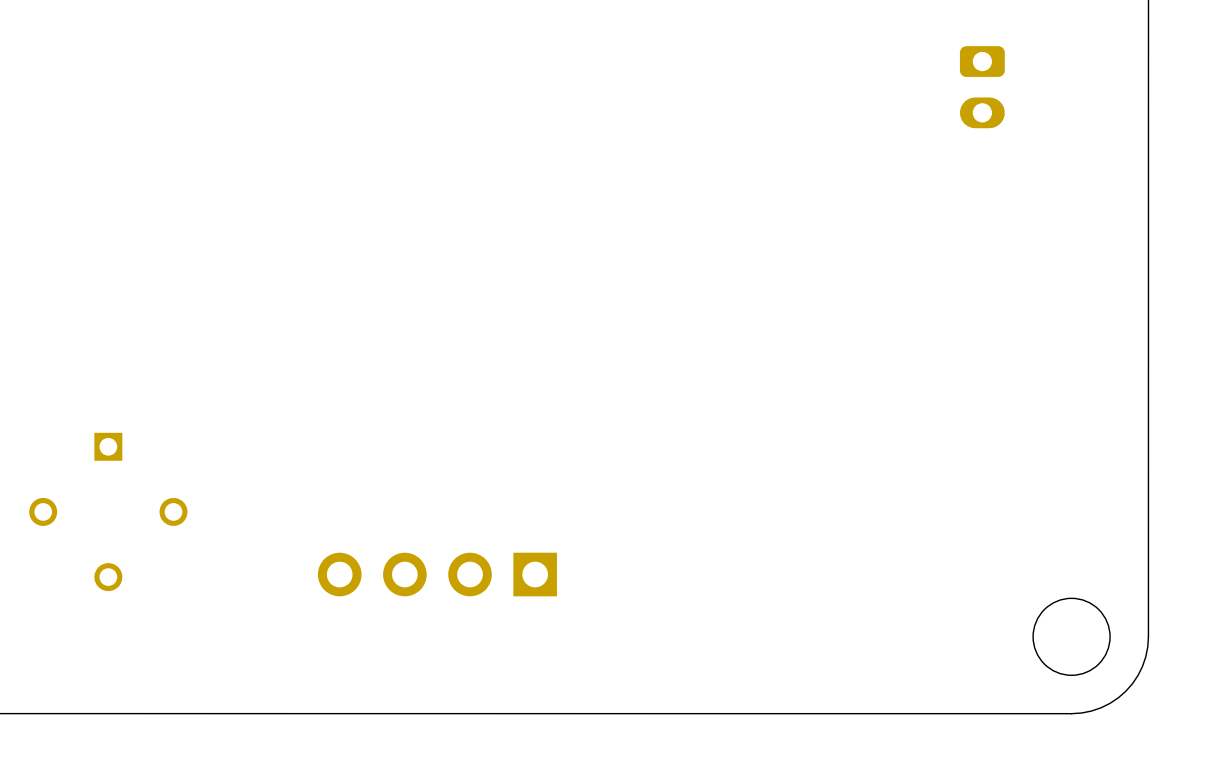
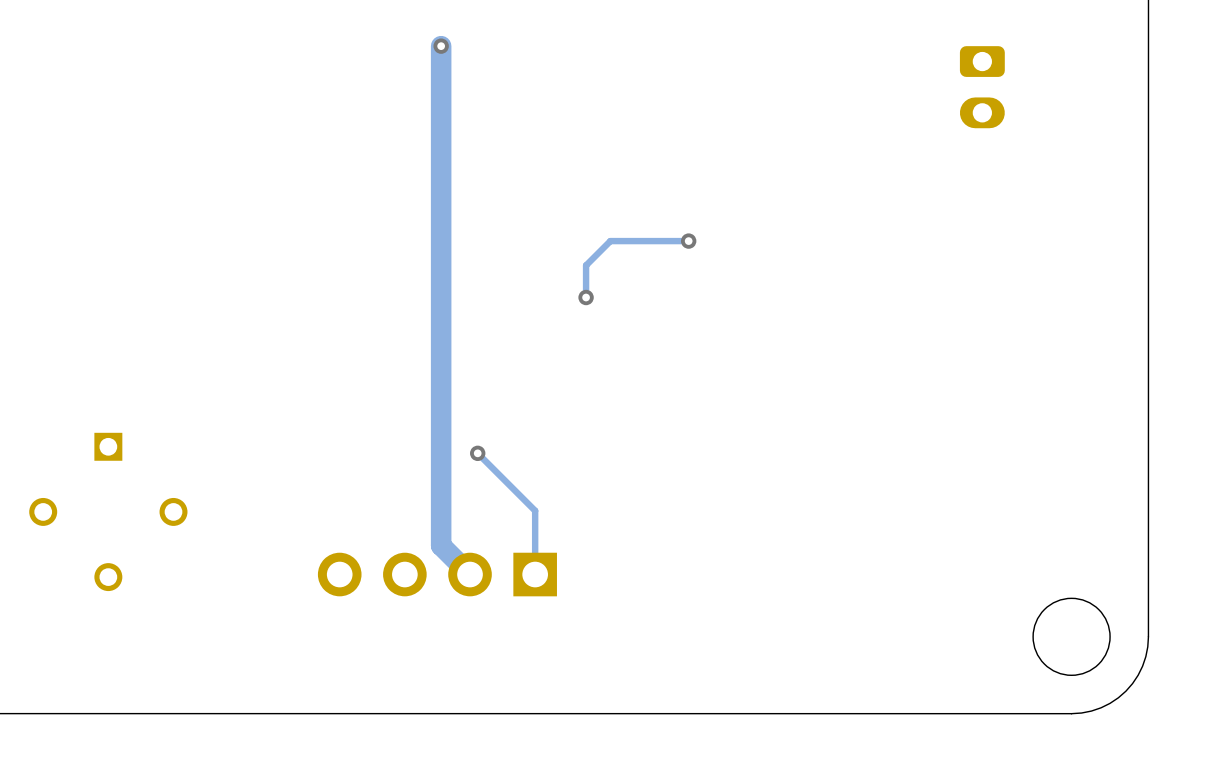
track: none -> (441, 46) (441, 545) (470, 574)
via: none -> (441, 46)
track: none -> (688, 241) (610, 241) (586, 265) (586, 297)
via: none -> (688, 241)
via: none -> (586, 297)
track: none -> (477, 453) (535, 510) (535, 574)
via: none -> (477, 453)

